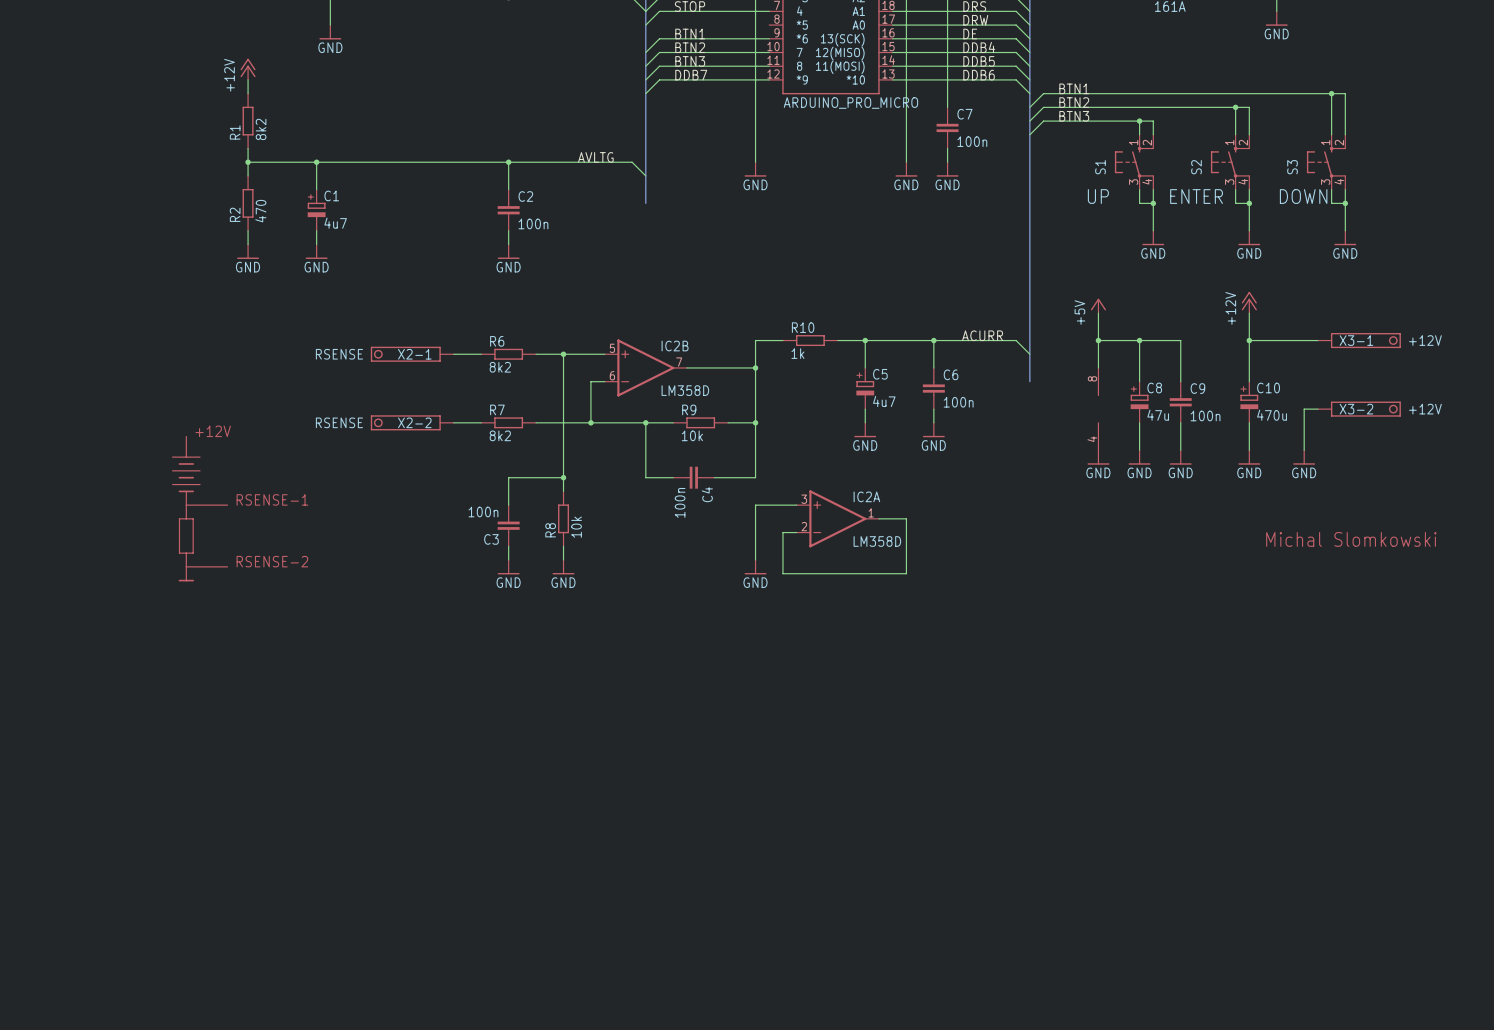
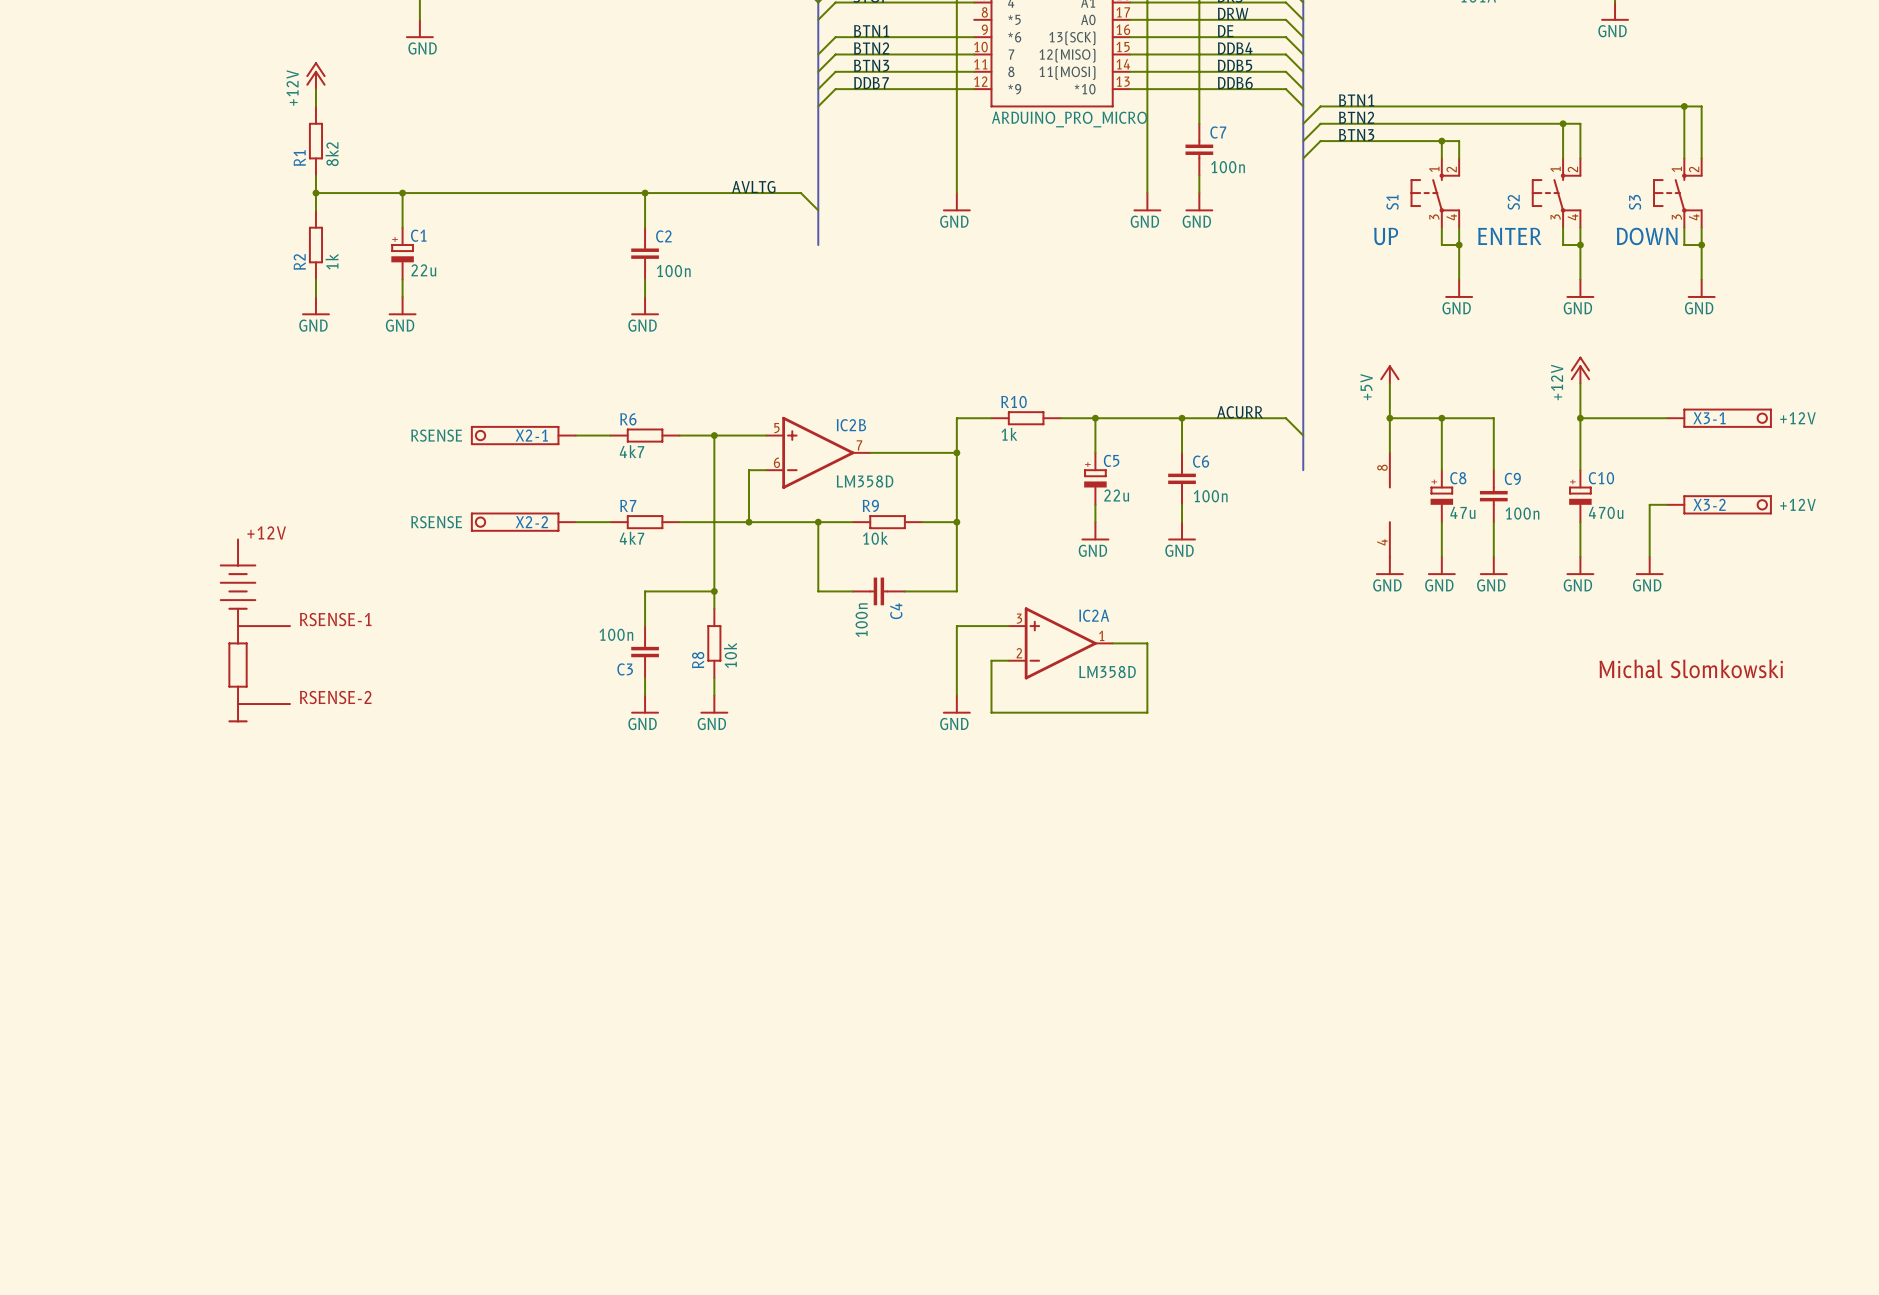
R2 value: 470 (260, 211) -> 1k (332, 261)
C1 value: 4u7 (335, 223) -> 22u (423, 270)
R6 value: 8k2 (500, 367) -> 4k7 (632, 451)
C5 value: 4u7 (884, 401) -> 22u (1116, 495)
R7 value: 8k2 (500, 435) -> 4k7 (632, 538)

